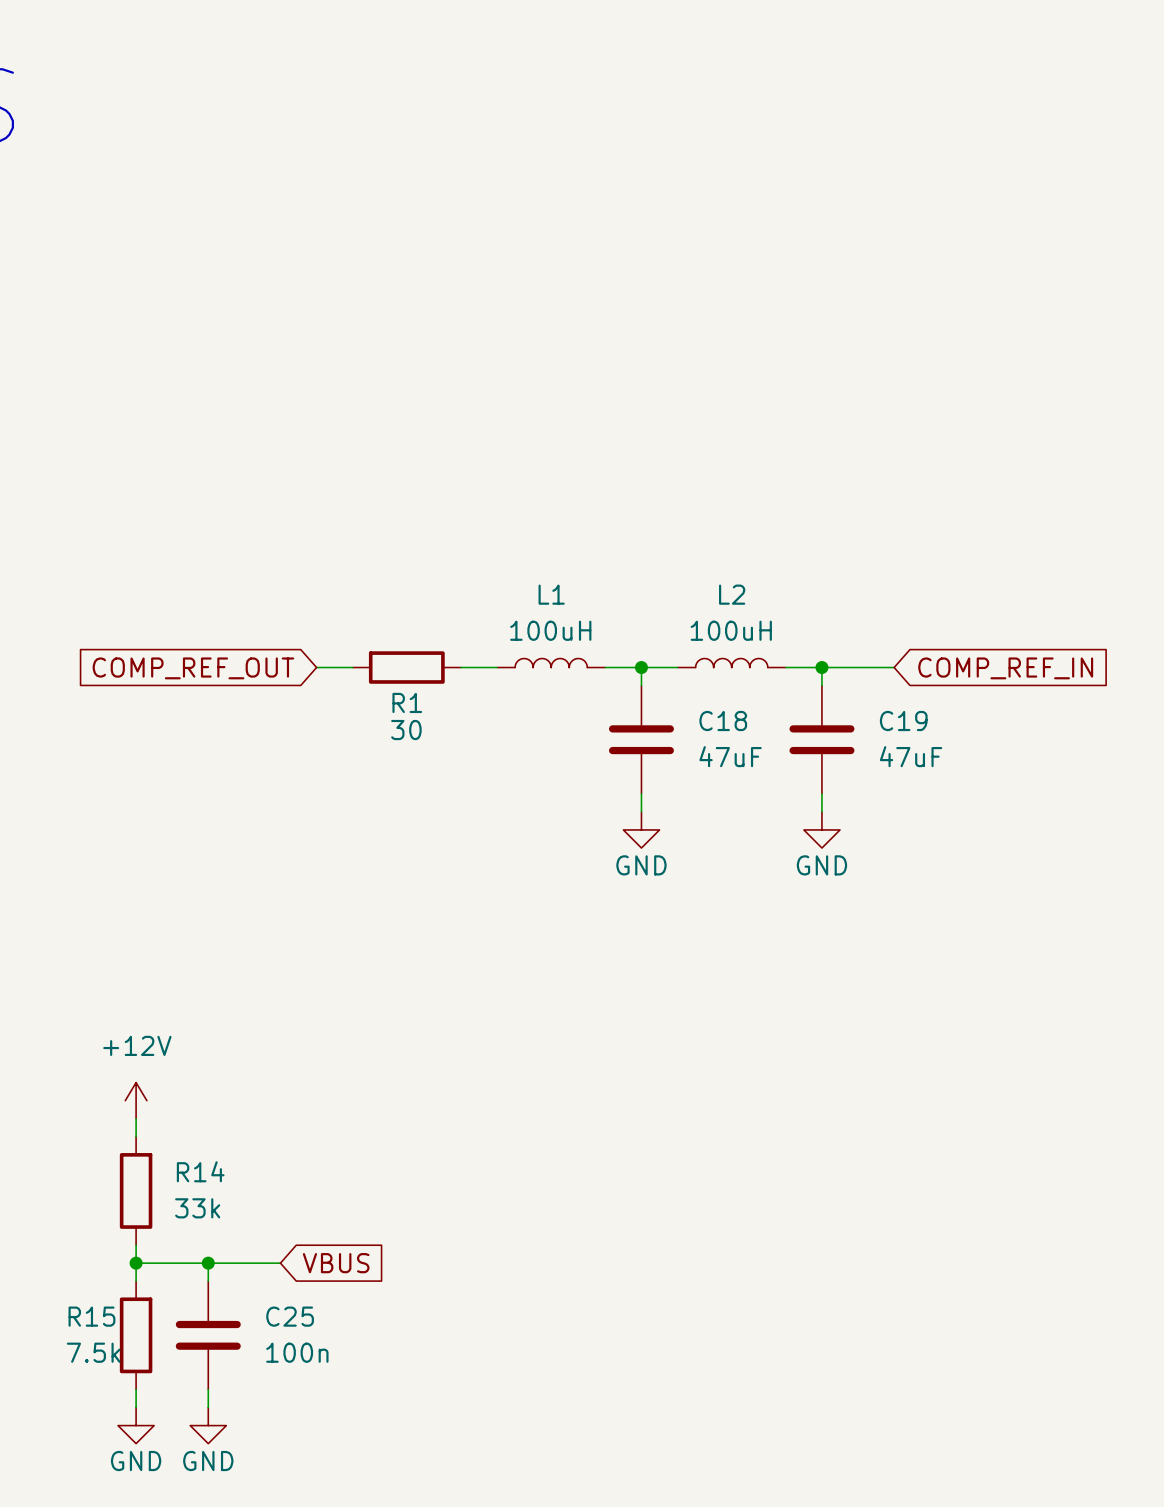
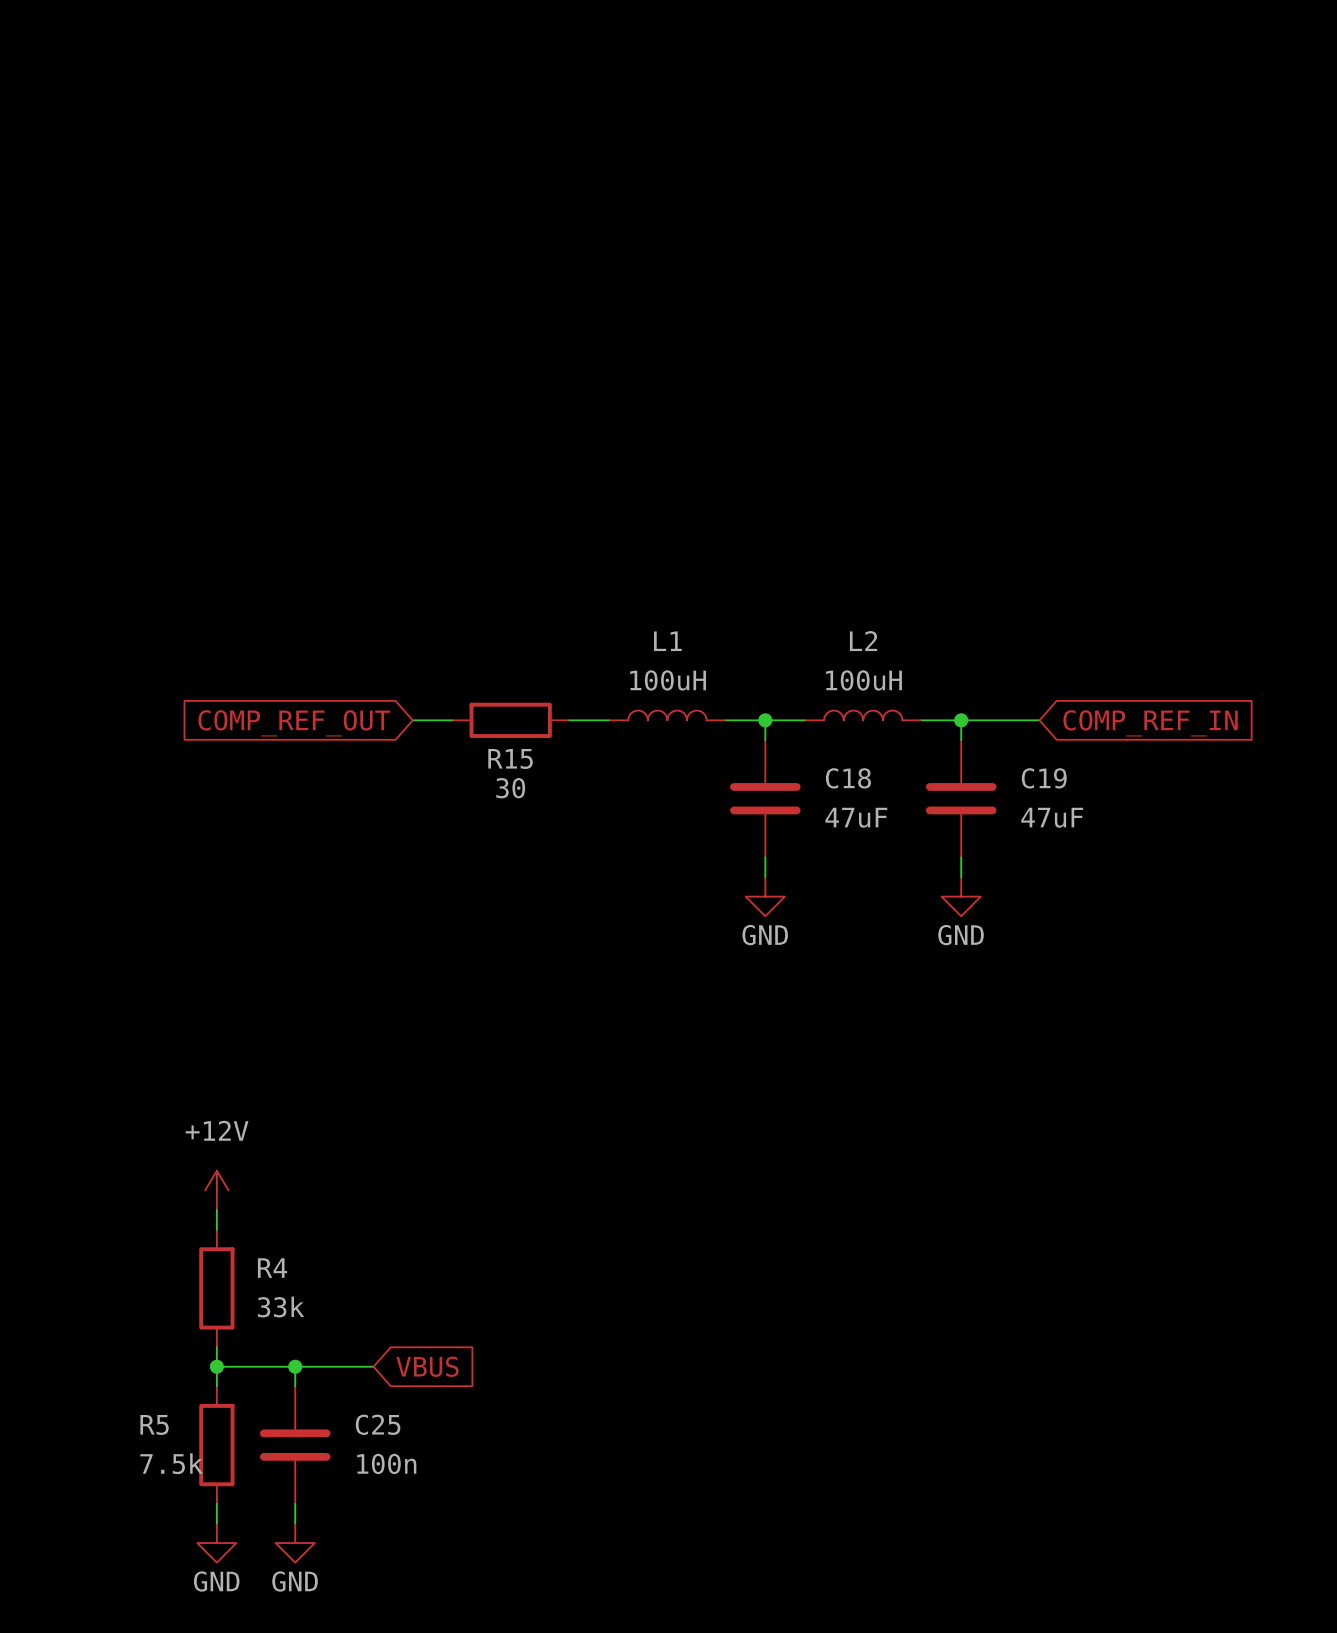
R1 name: R1 (407, 702) -> R15 (510, 758)
R14 name: R14 (200, 1171) -> R4 (272, 1268)
R15 name: R15 (91, 1316) -> R5 (154, 1424)

